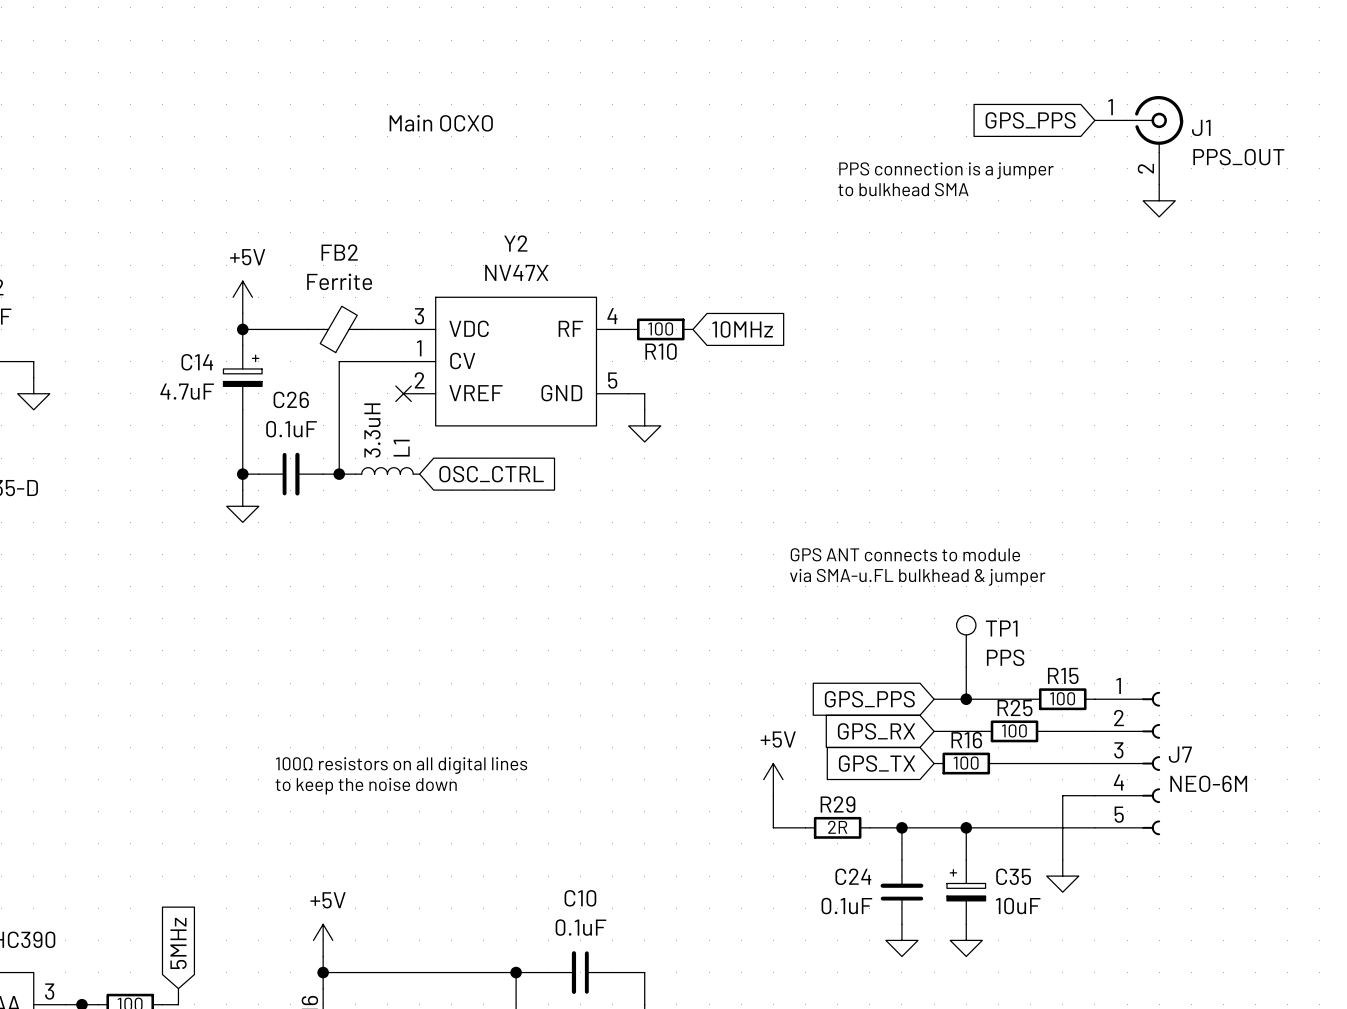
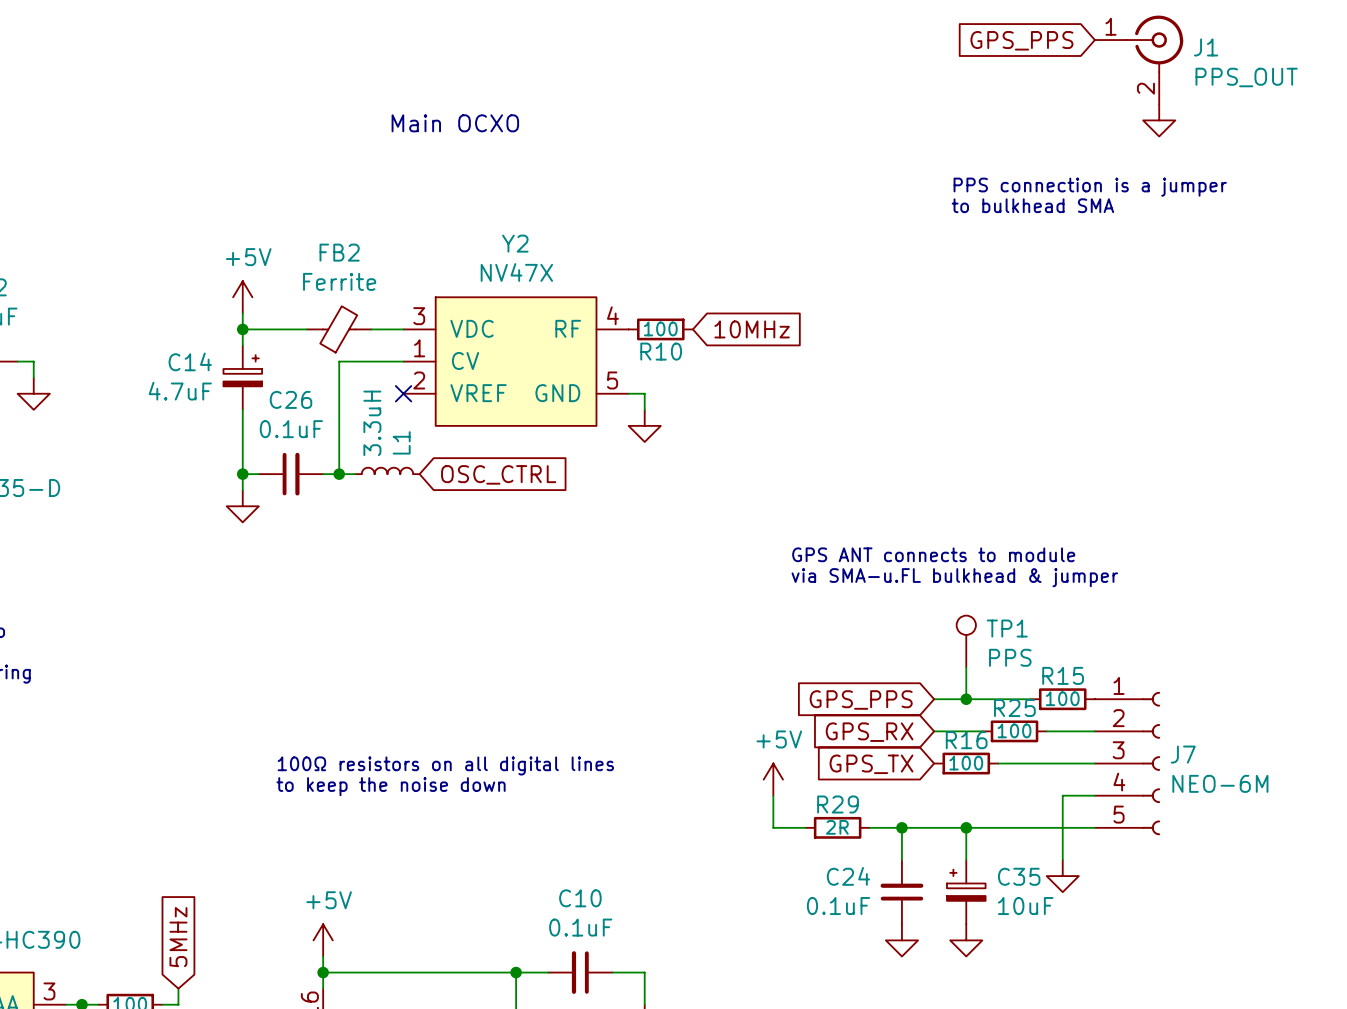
global label position: GPS_PPS (1030, 120) -> GPS_PPS (1021, 40)
J1 position: (1139, 140) -> (1139, 59)
text position: PPS connection is a jumper (946, 170) -> PPS connection is a jumper (1090, 187)
text position: to bulkhead SMA (903, 189) -> to bulkhead SMA (1032, 205)
power symbol position: (1159, 200) -> (1159, 120)

